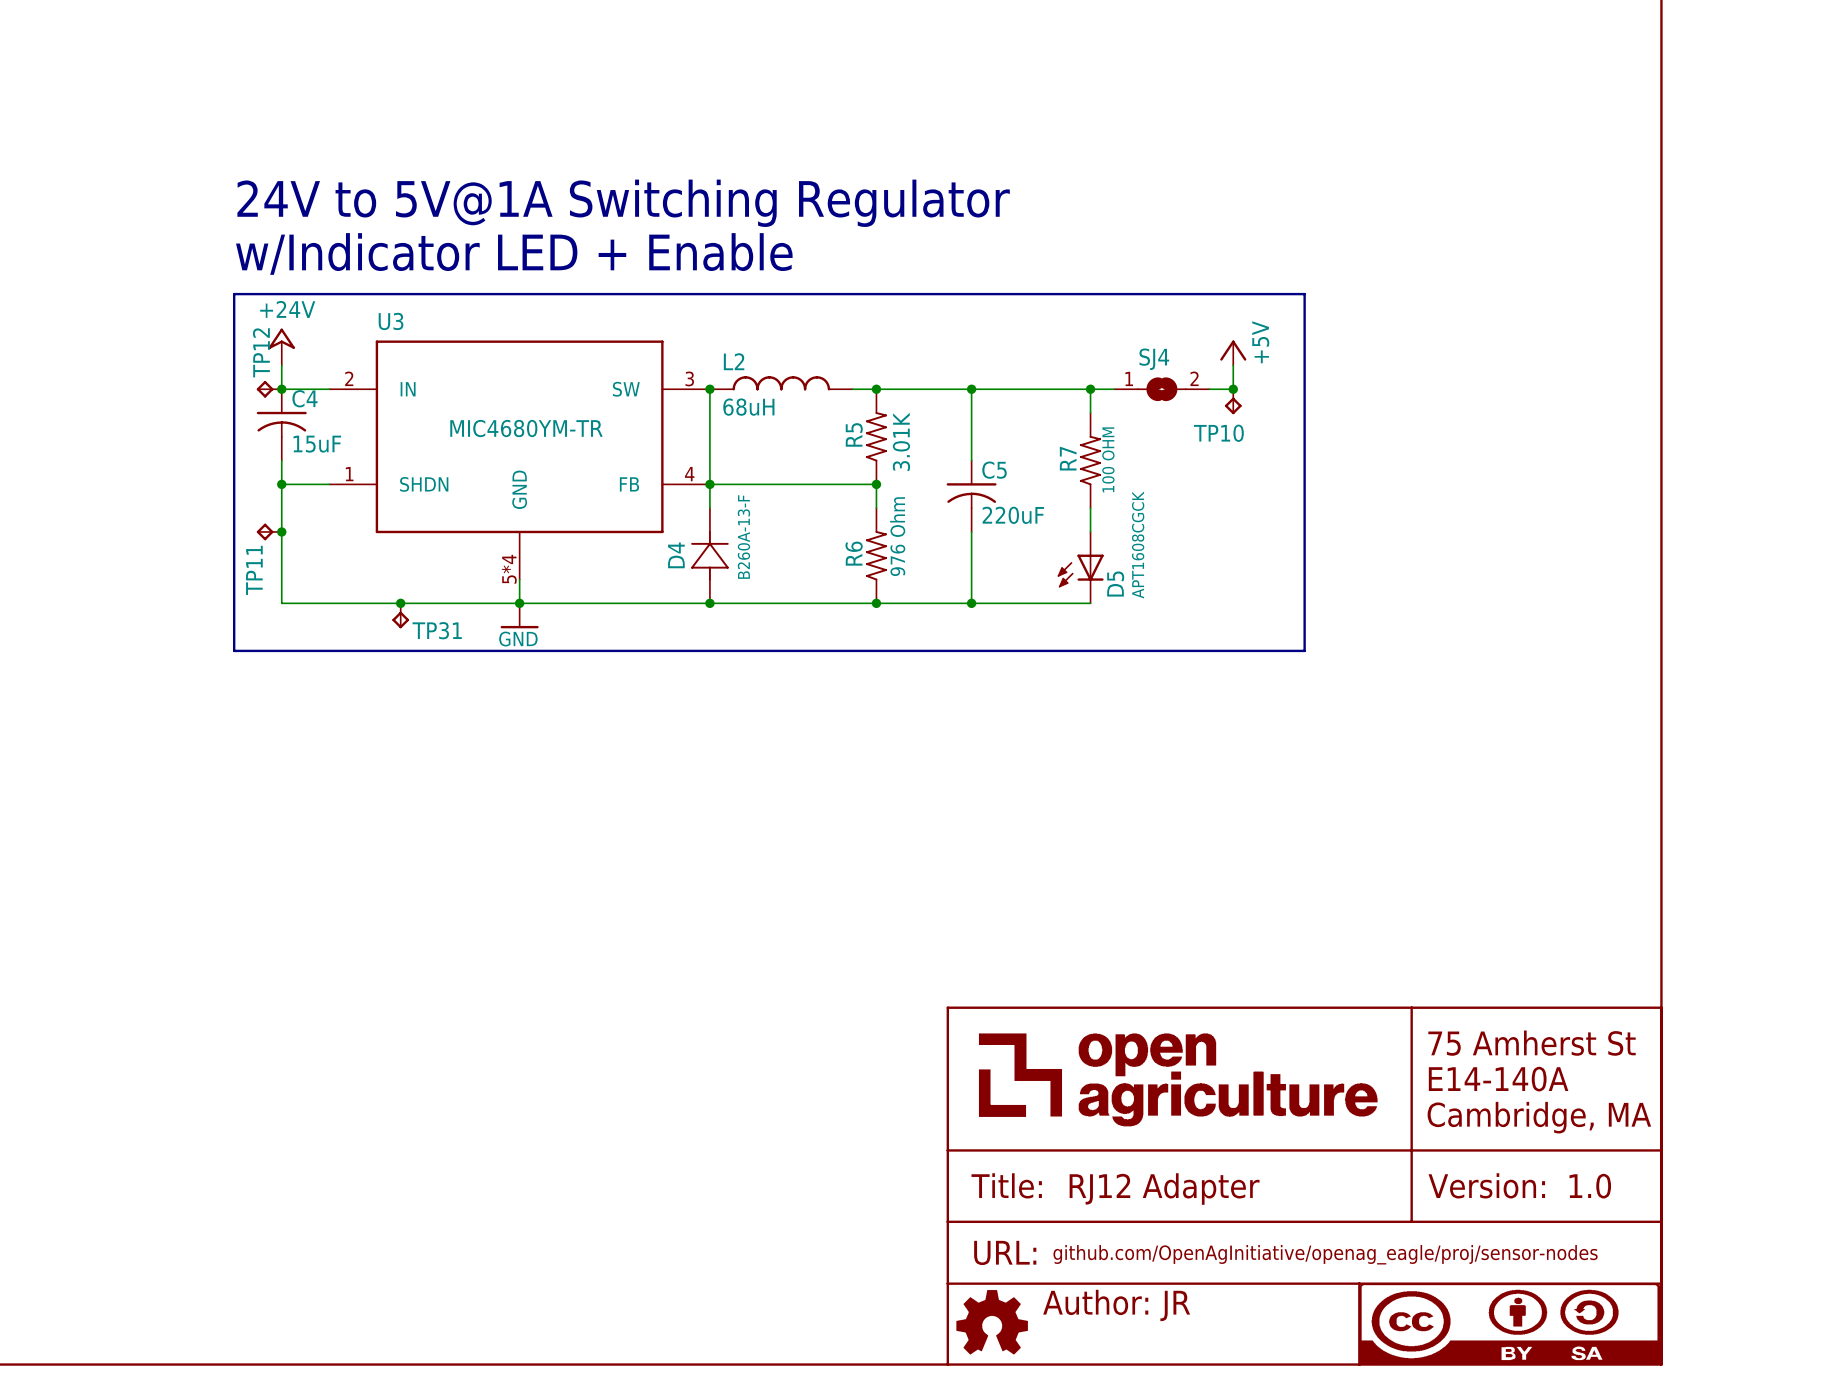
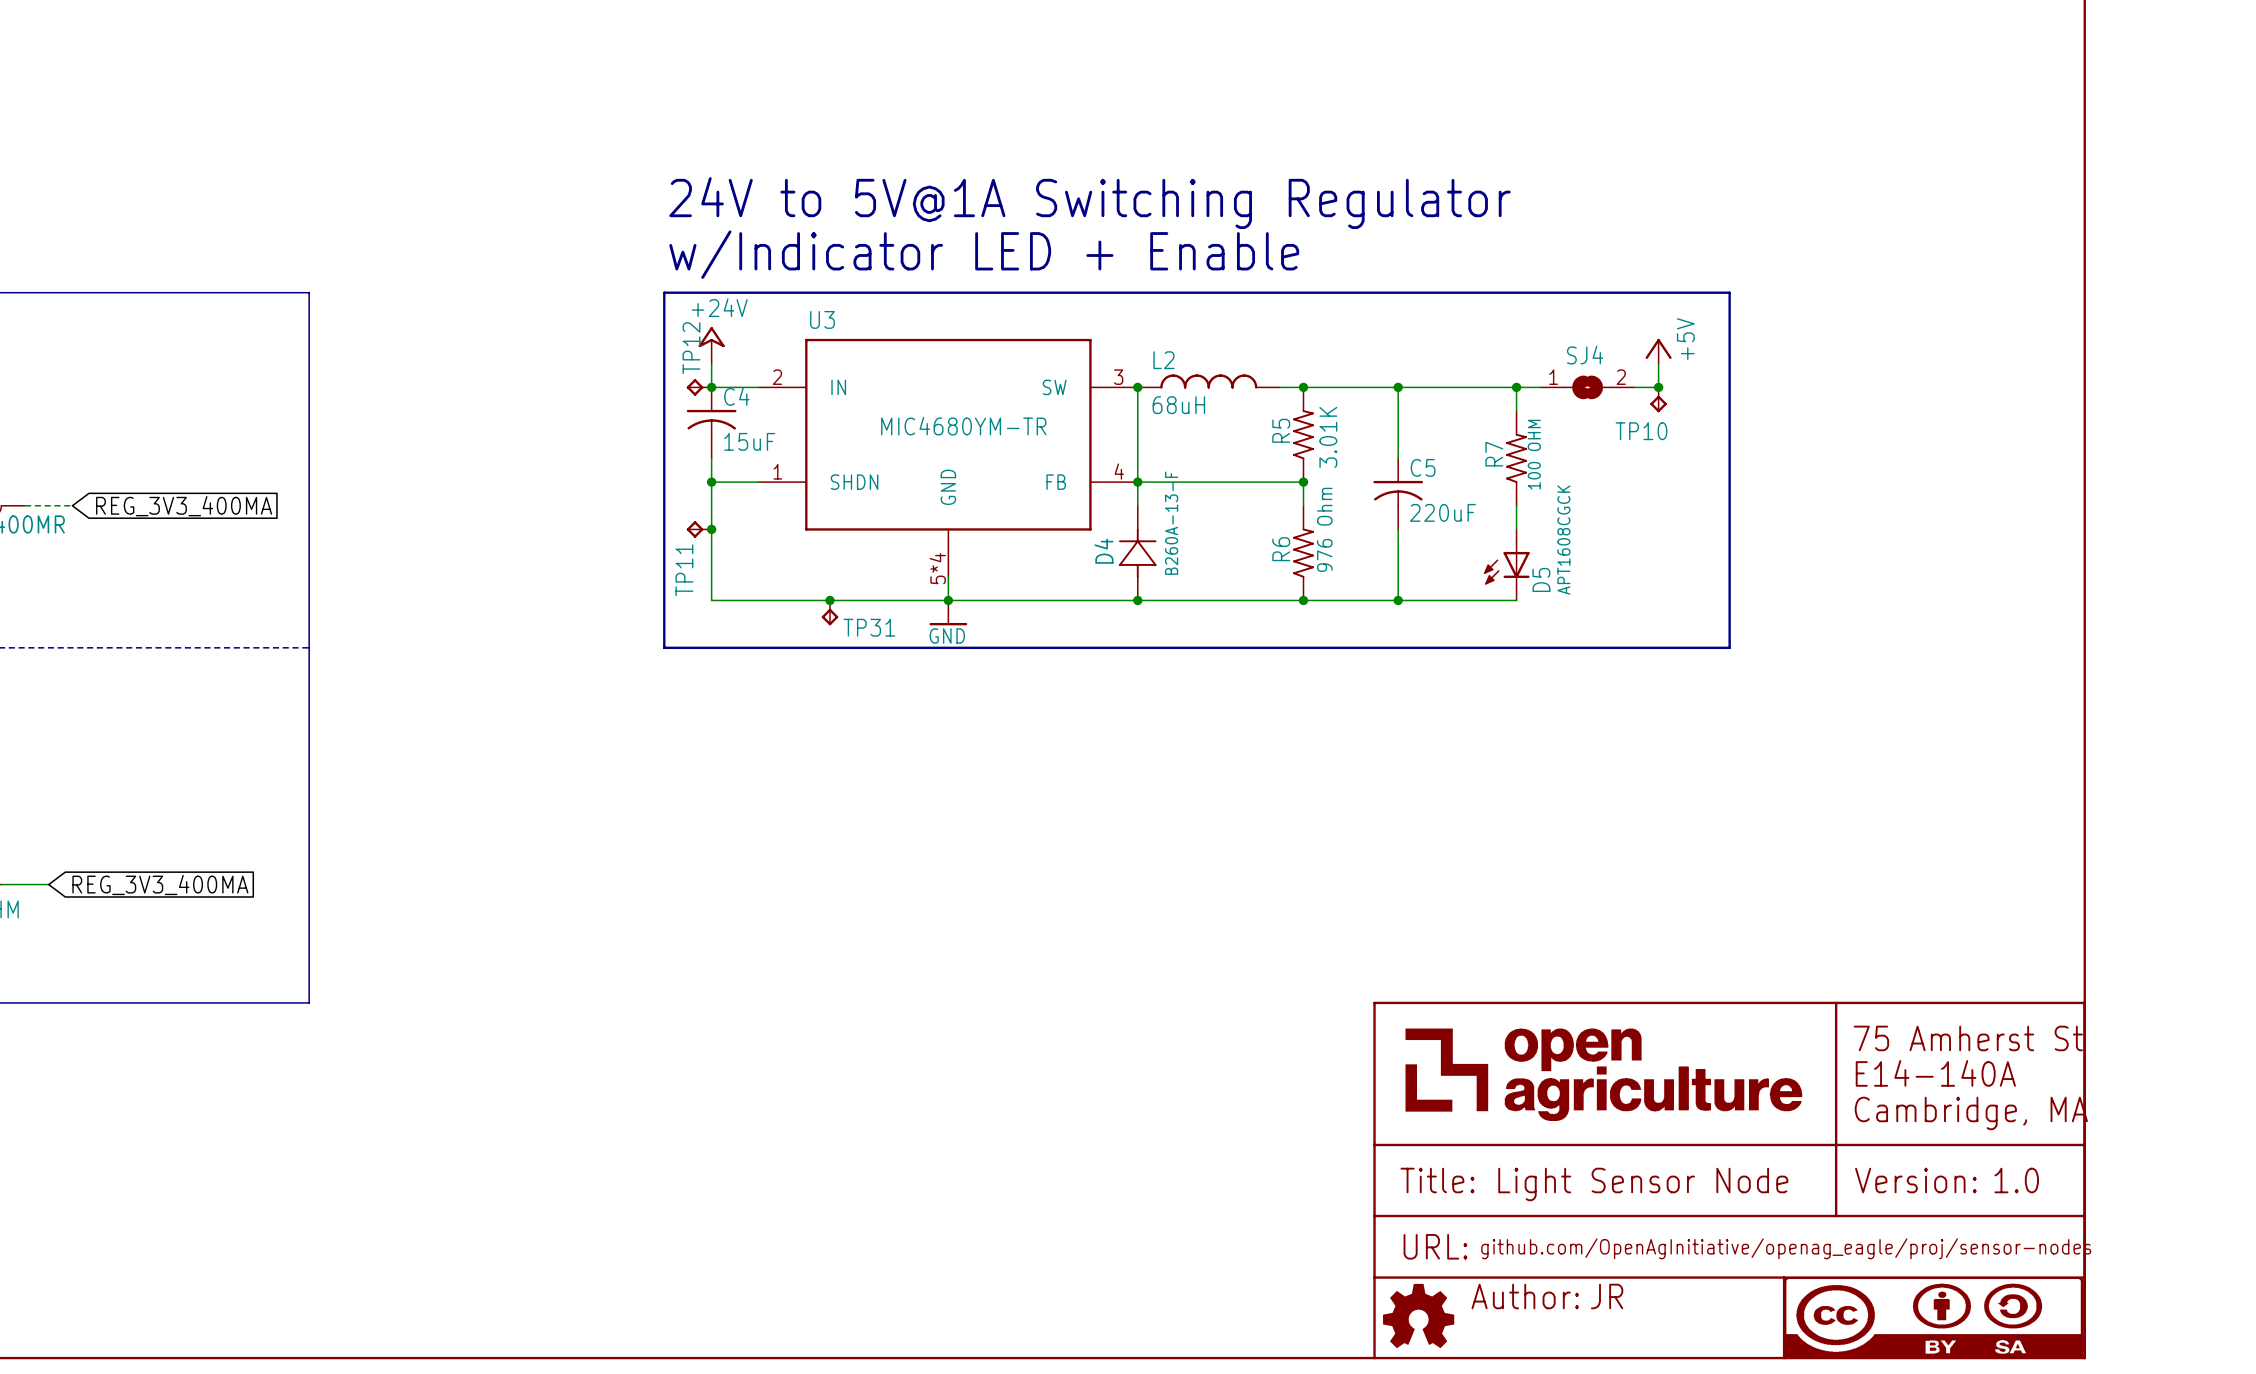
part text: RJ12 Adapter (1164, 1189) -> Light Sensor Node (1643, 1184)

